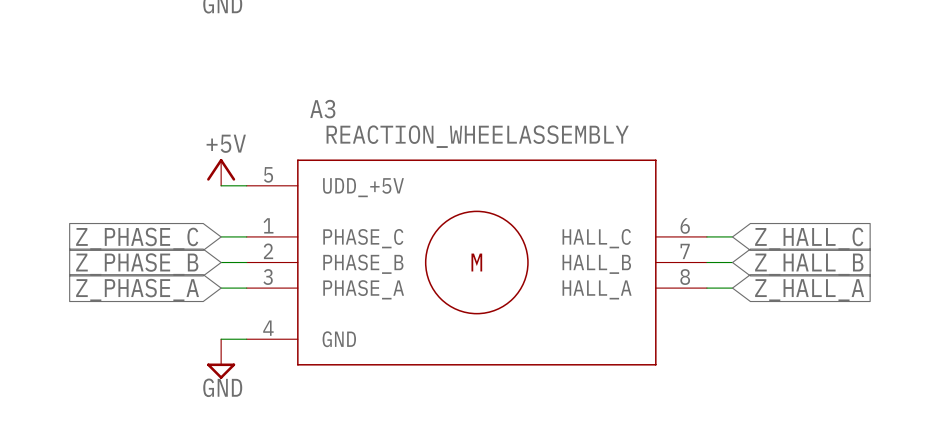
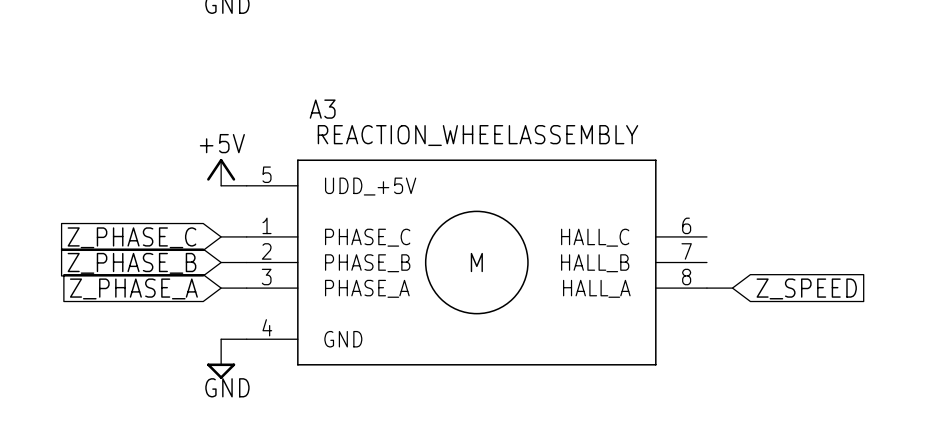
wire: (706, 236) (732, 236) -> none
global label: Z_HALL_C (809, 238) -> none
wire: (706, 262) (732, 262) -> none
global label: Z_HALL_B (809, 264) -> none
global label: Z_HALL_A (809, 290) -> Z_SPEED (806, 288)

